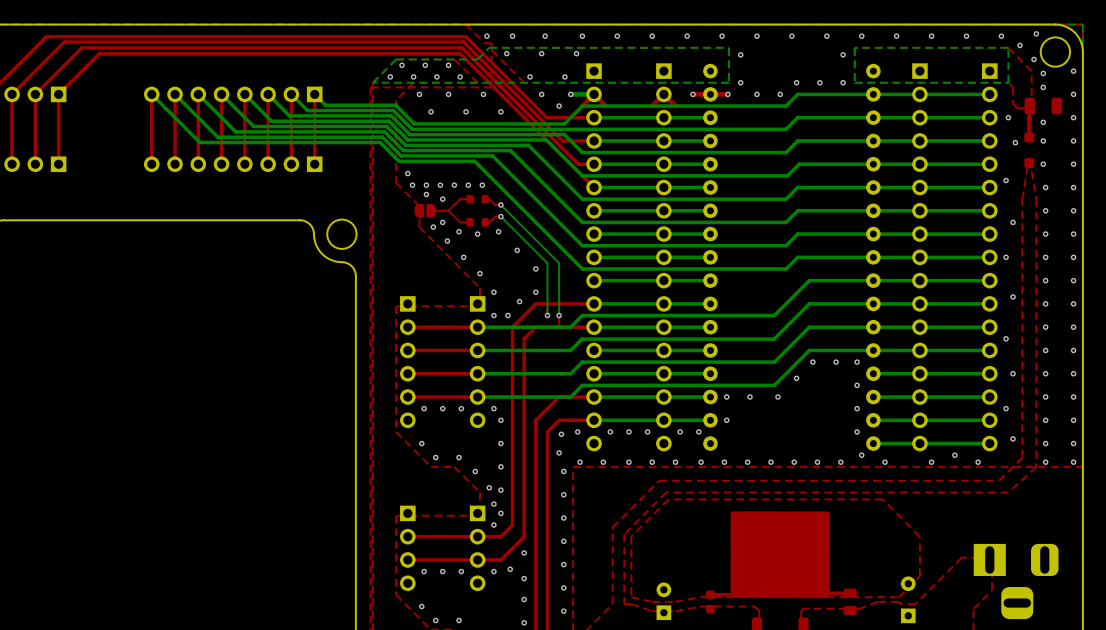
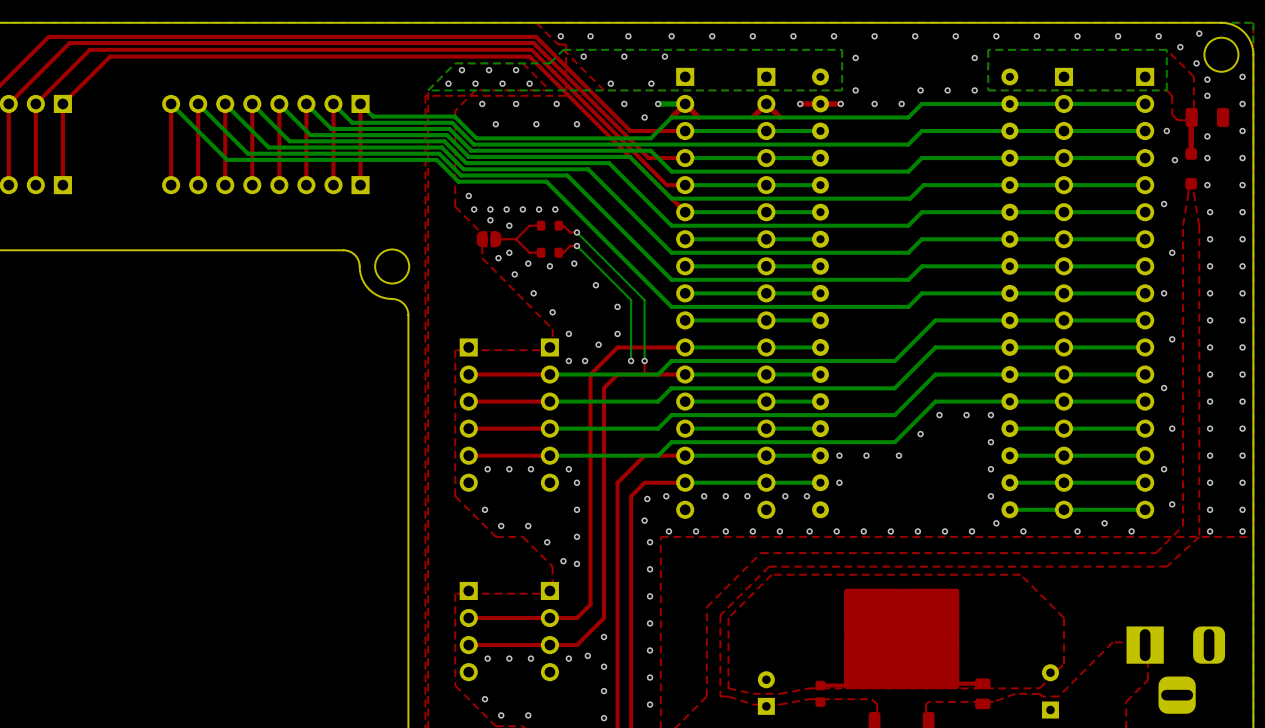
via: (493, 504) -> none
via: (500, 513) -> none
via: (493, 525) -> none

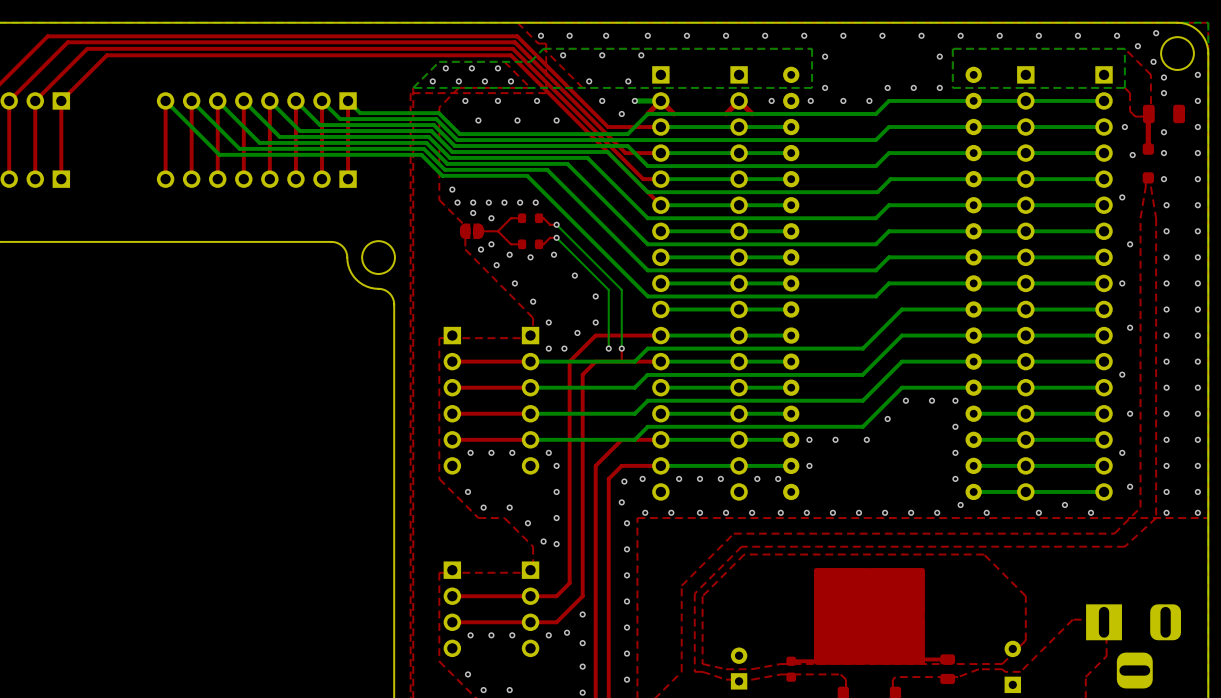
top track: (840, 103) (800, 103) -> none

